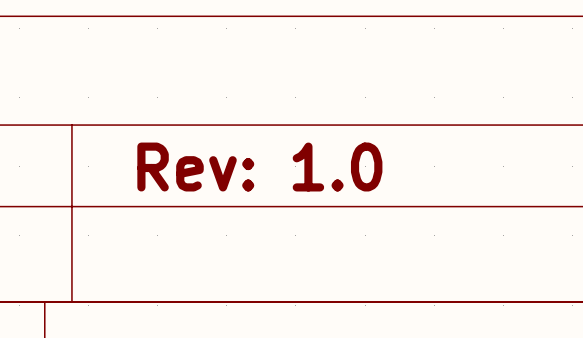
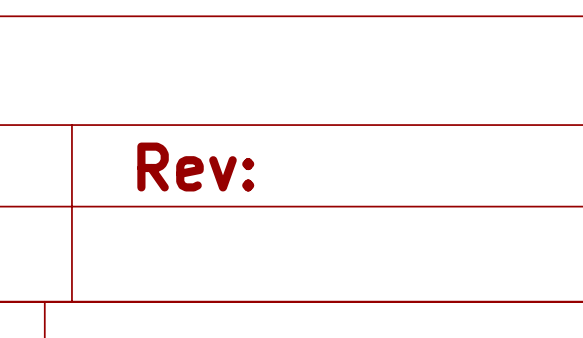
title block: Rev: 1.0 (259, 167) -> Rev: (195, 167)

